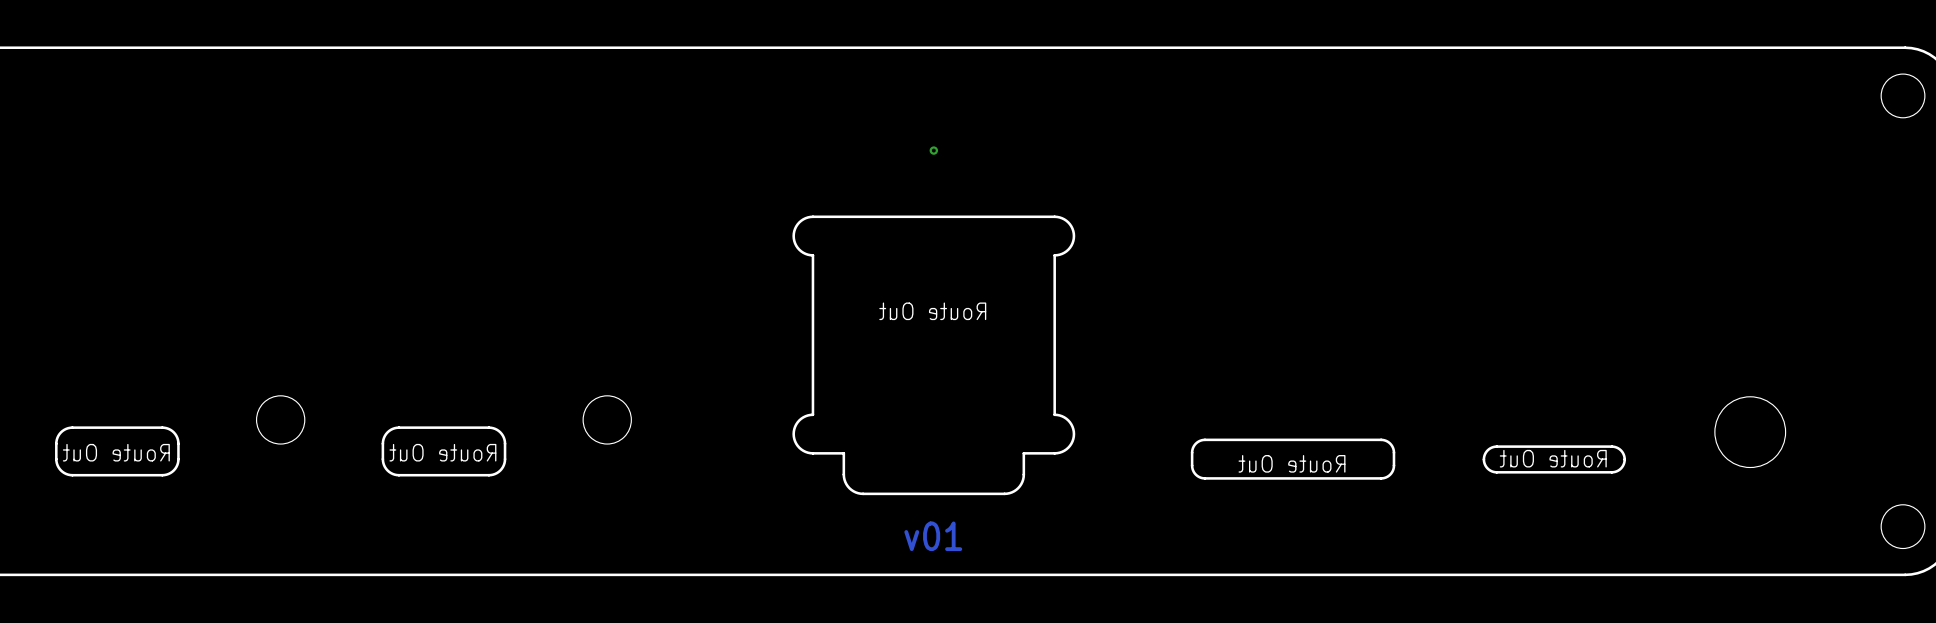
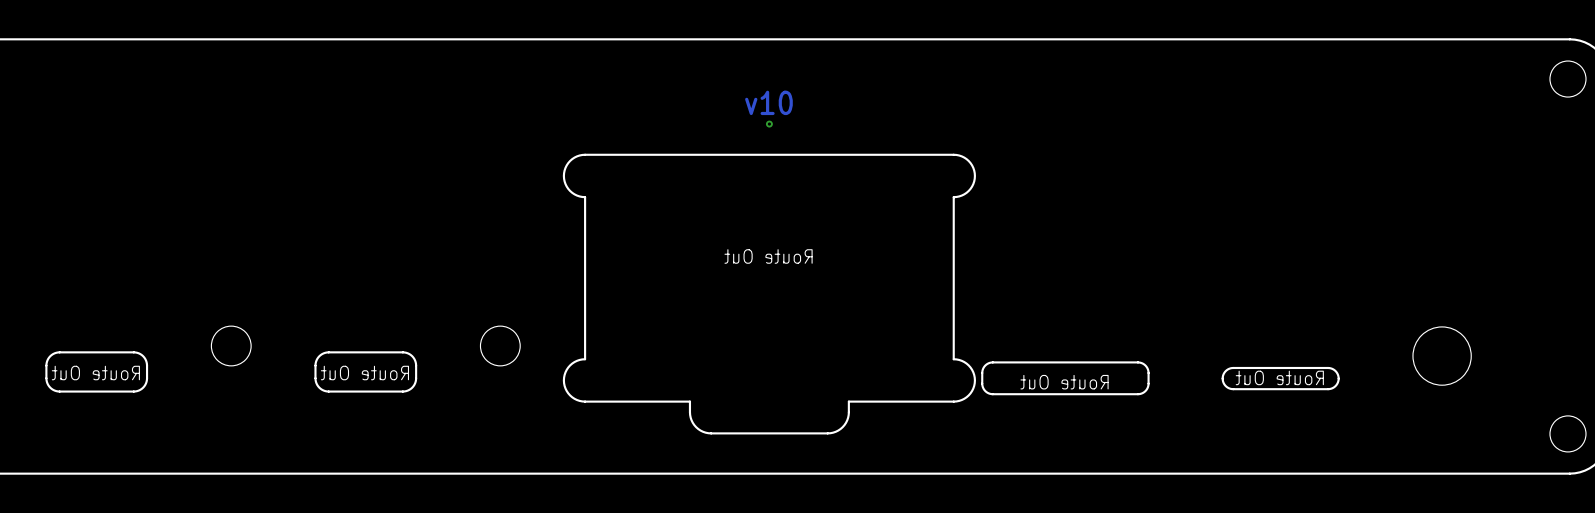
text: none -> v10 (768, 102)
drawing shape: [792, 215, 1076, 496] -> [562, 153, 976, 435]
text: v01 (933, 536) -> none

